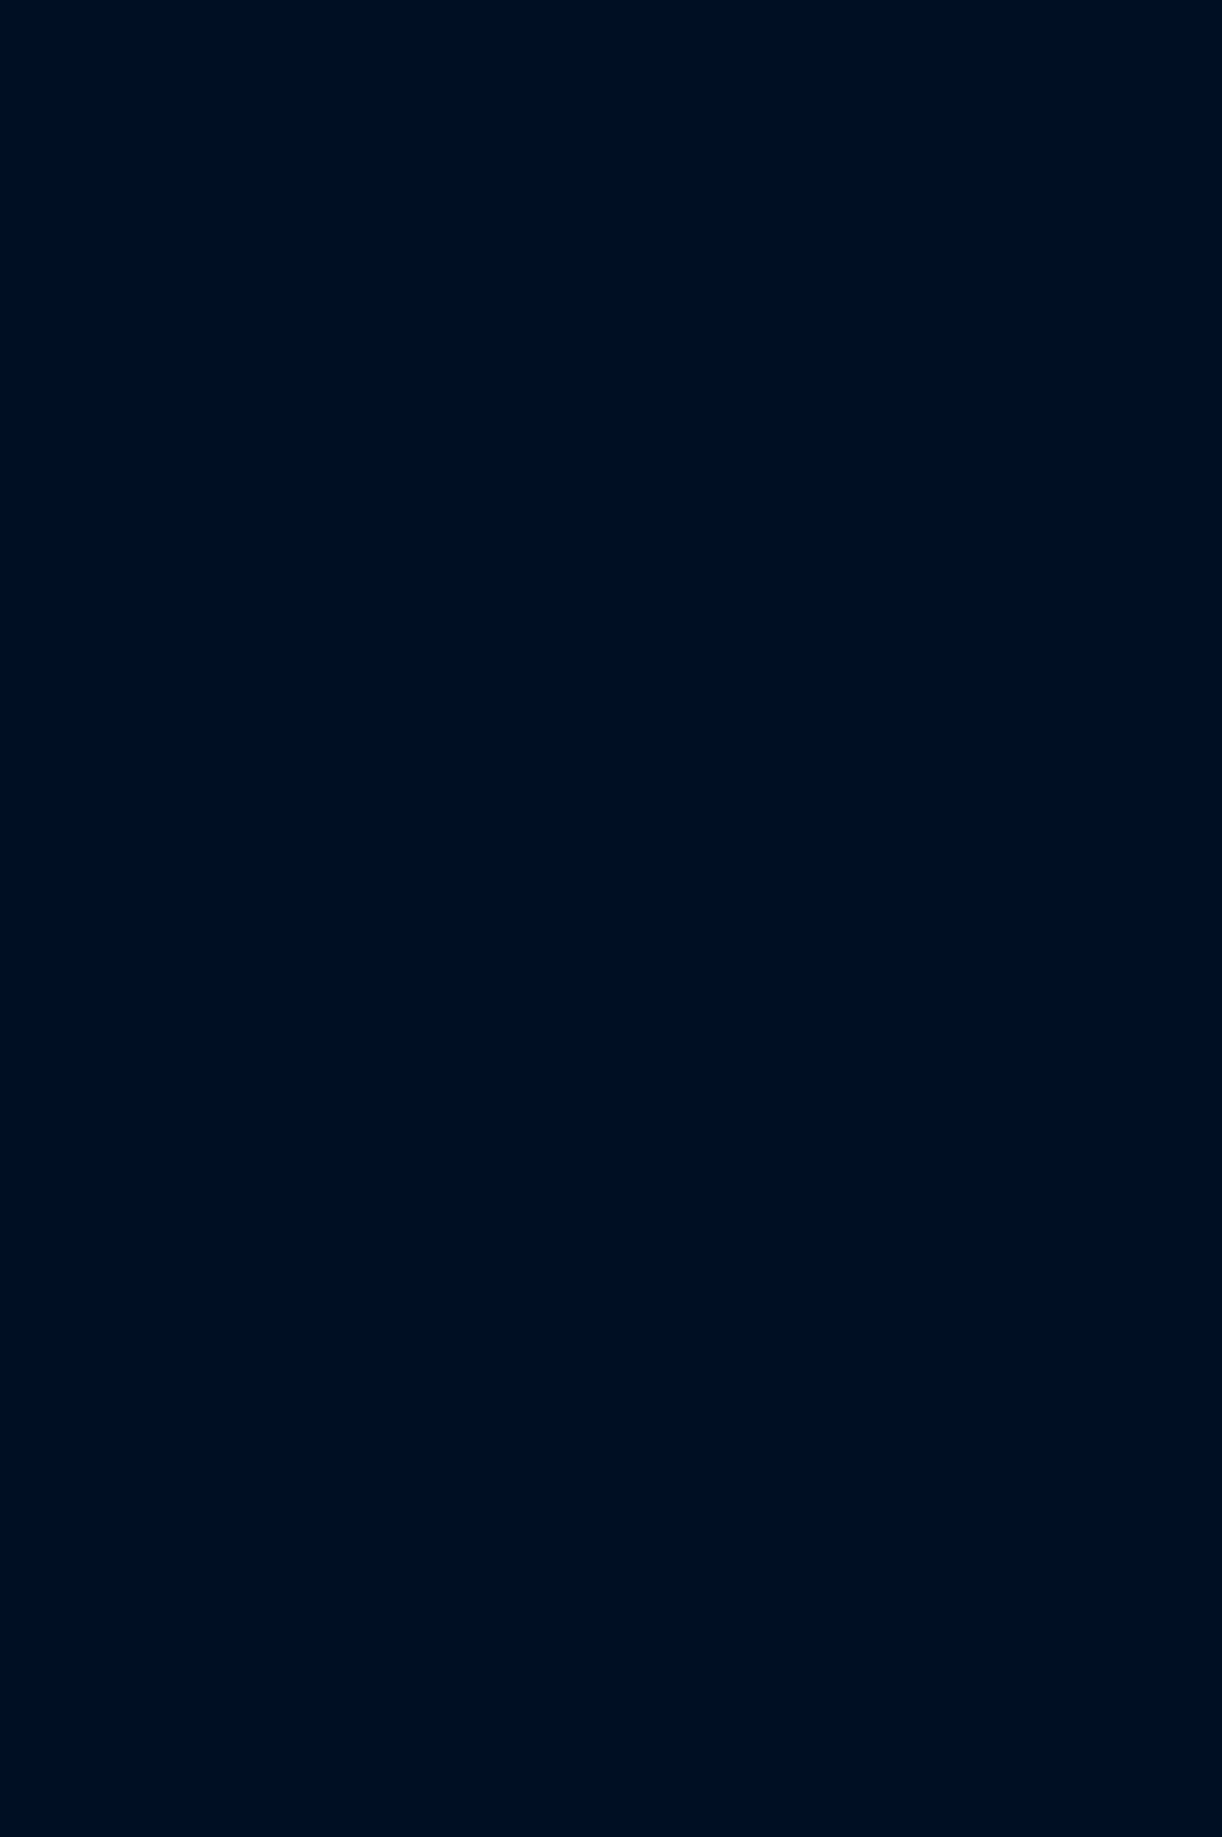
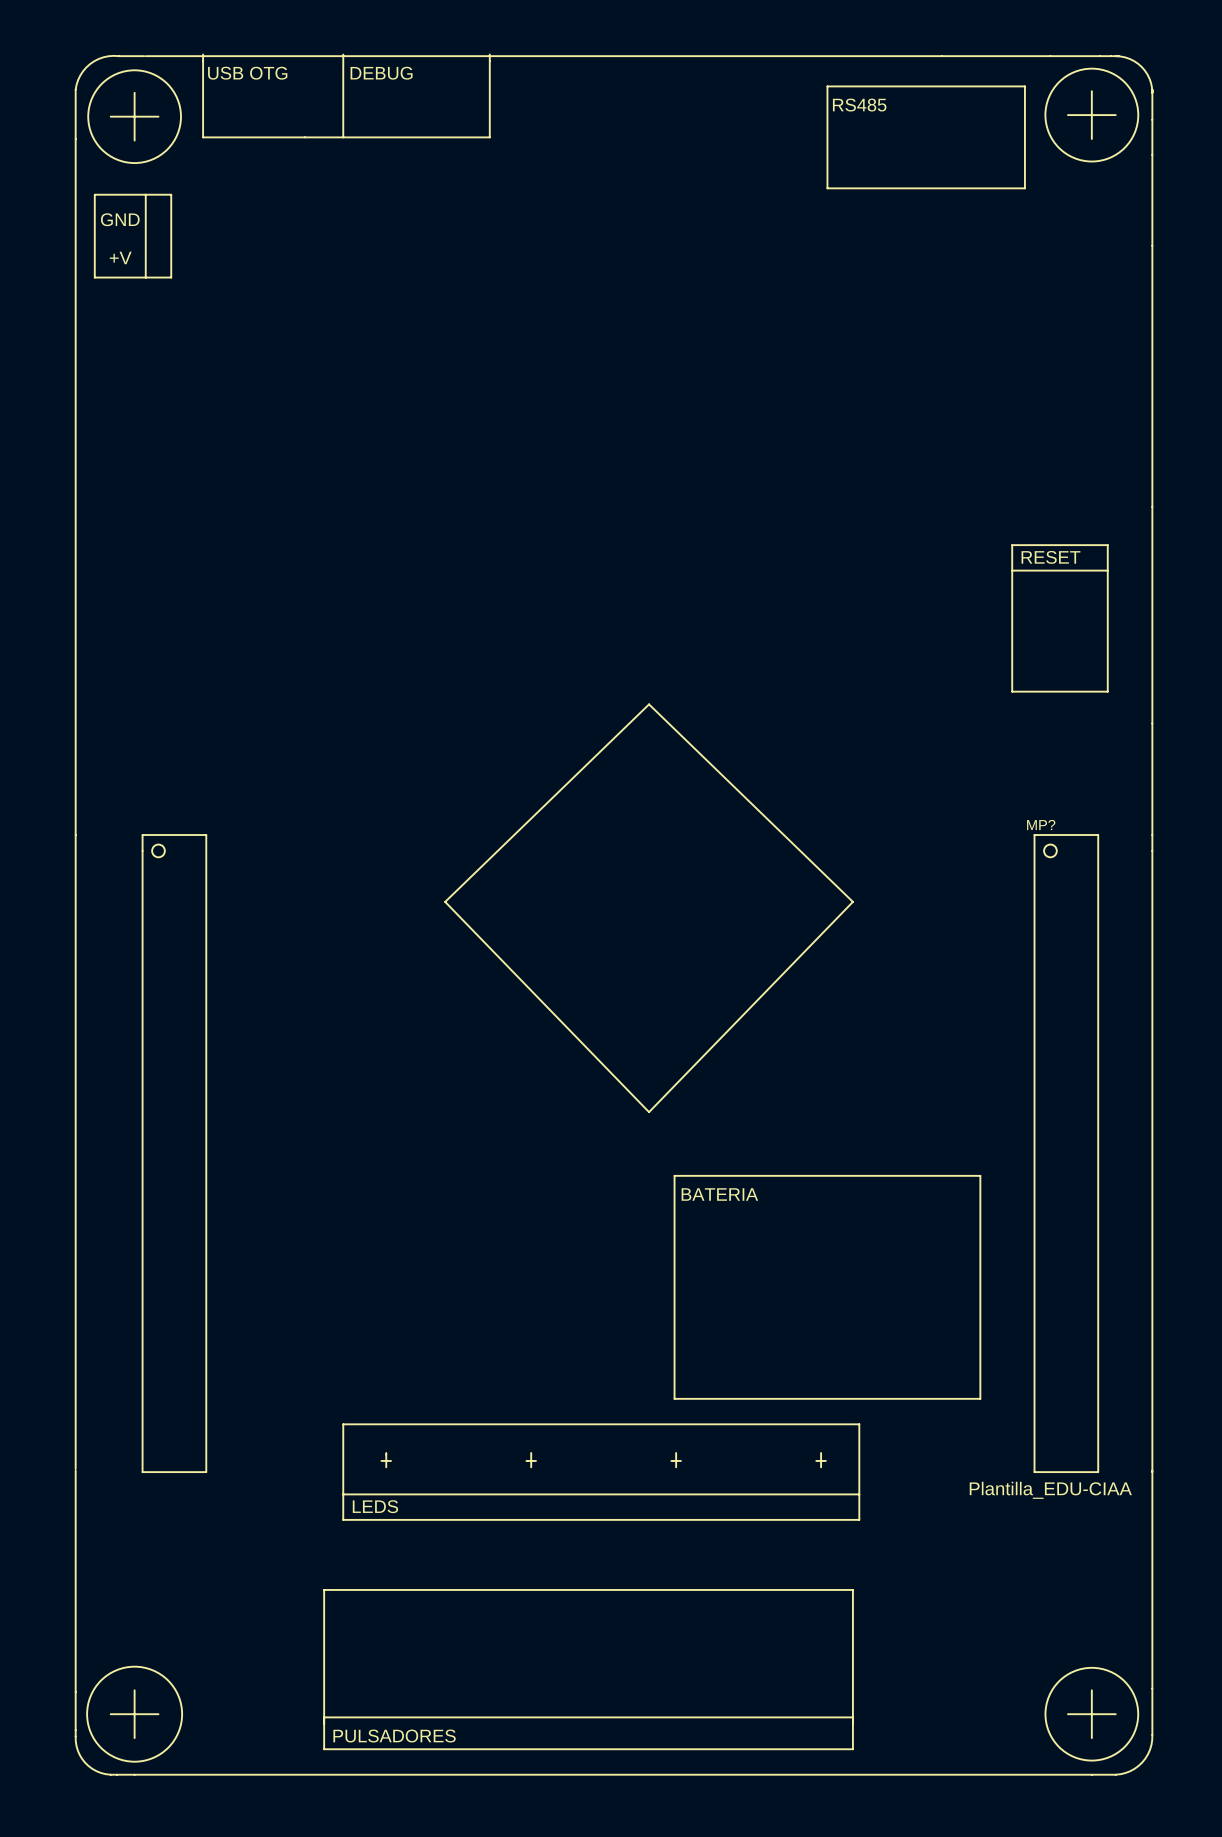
MP?: none -> Plantilla_EDU-CIAA (614, 914)

